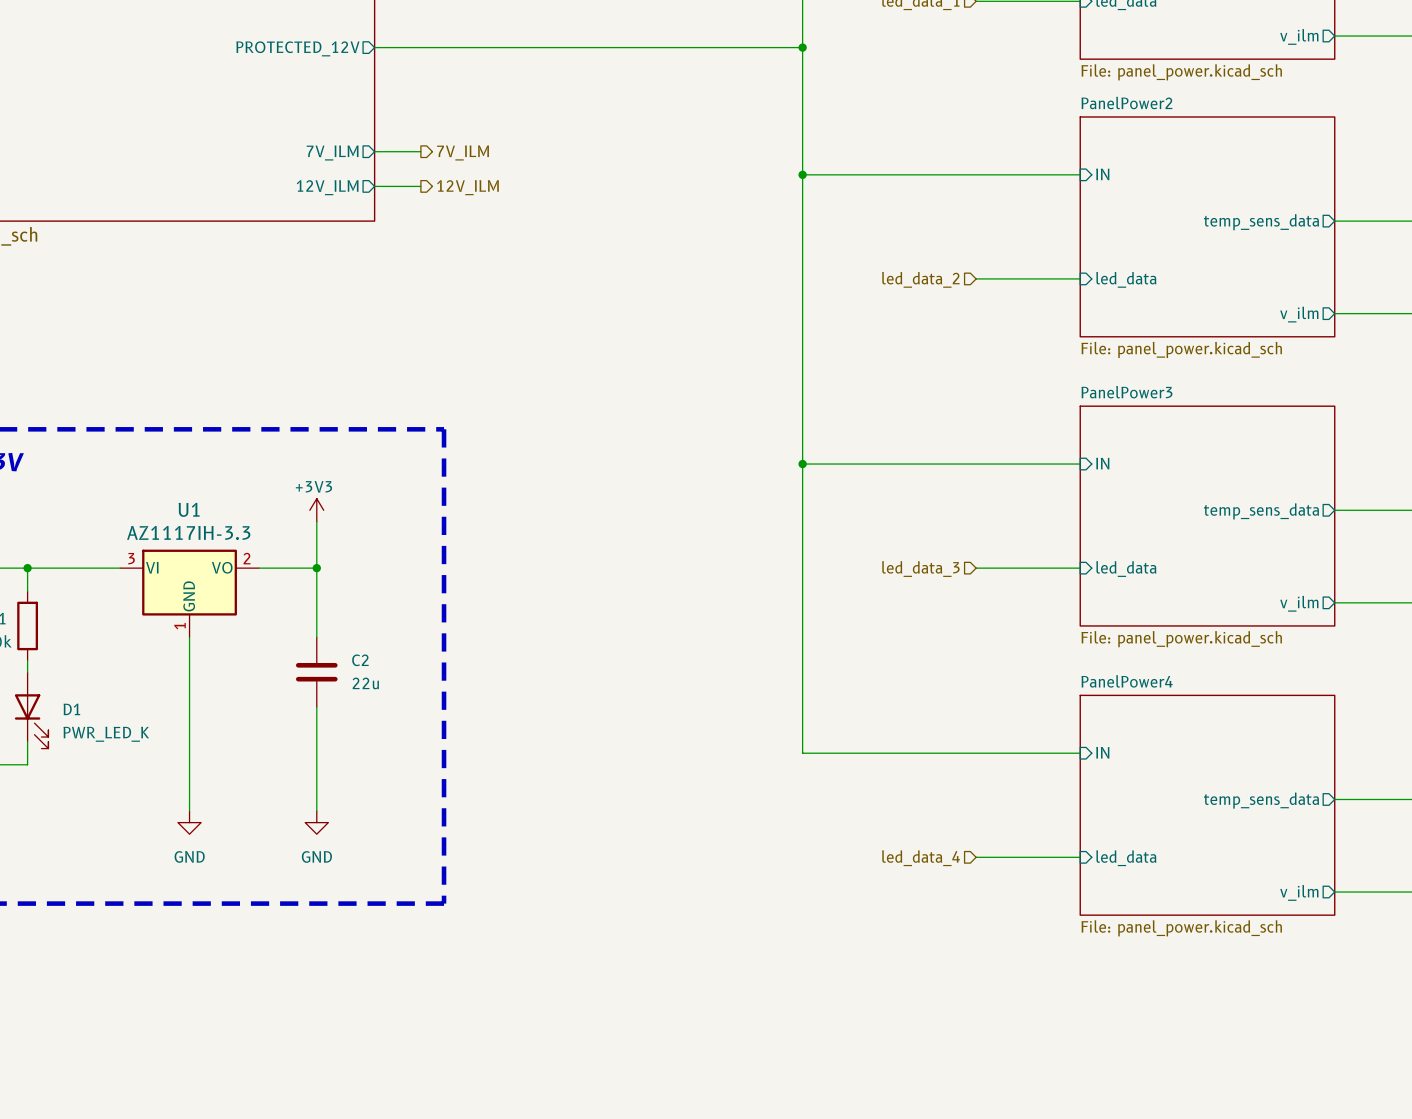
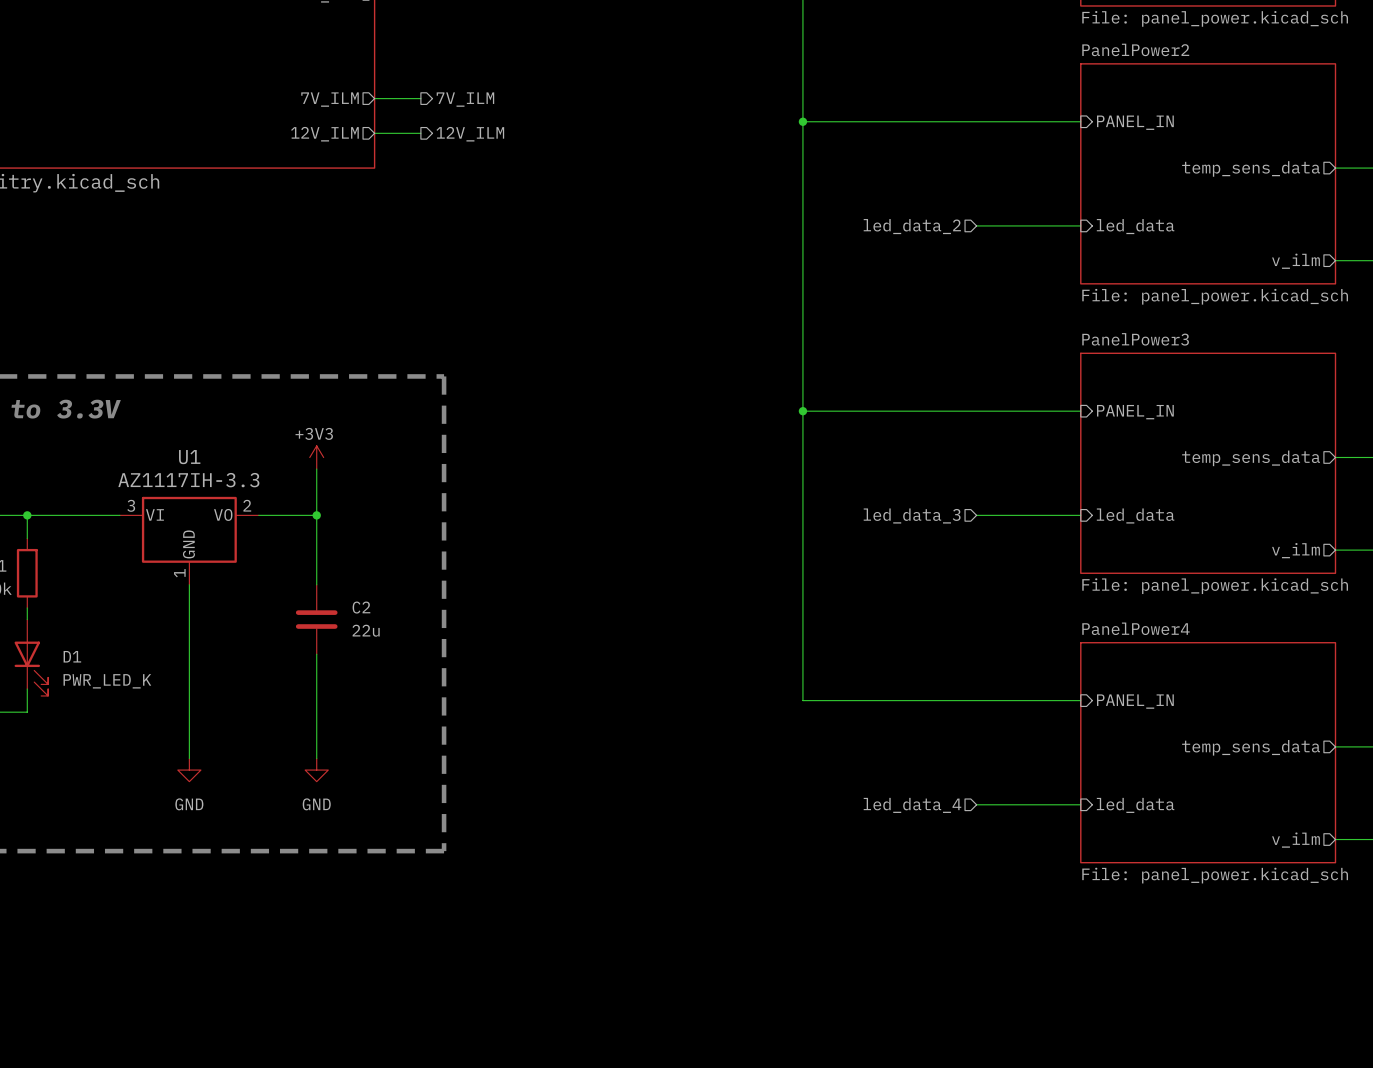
sheet pin: IN (1102, 174) -> PANEL_IN (1135, 122)
sheet pin: IN (1102, 463) -> PANEL_IN (1135, 412)
sheet pin: IN (1102, 752) -> PANEL_IN (1135, 701)

